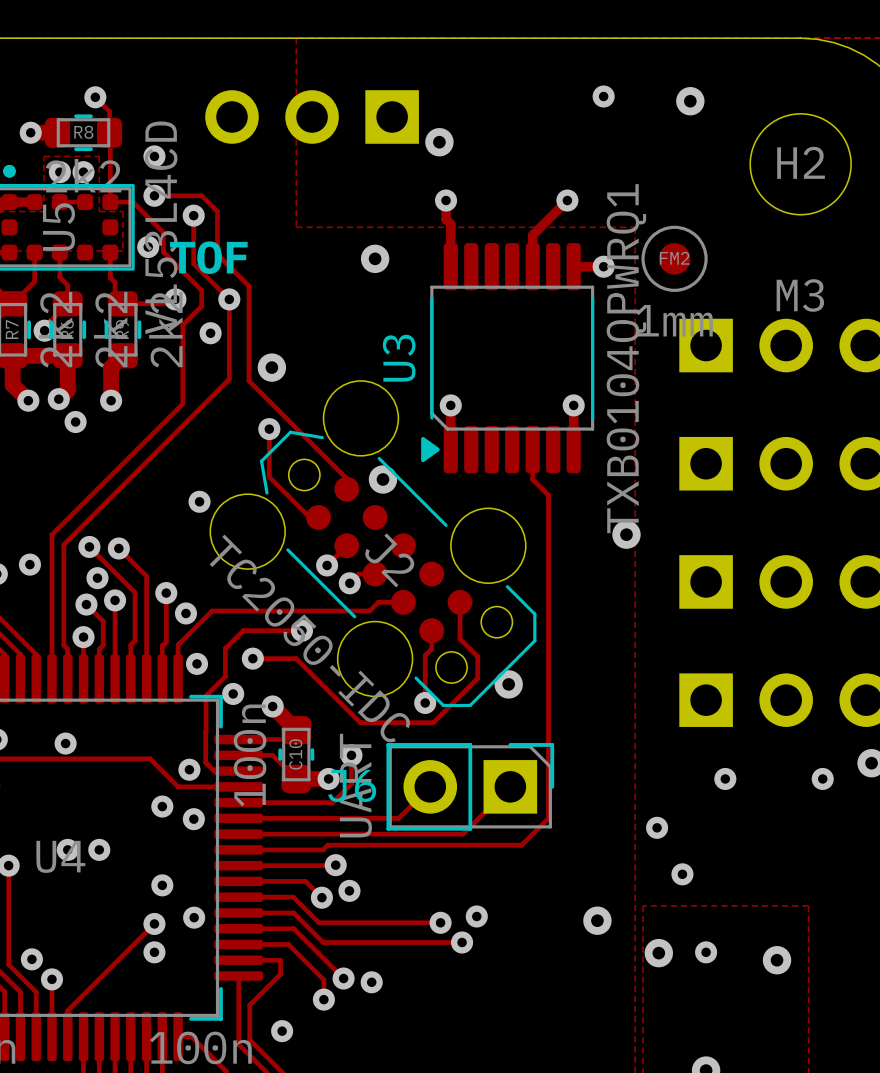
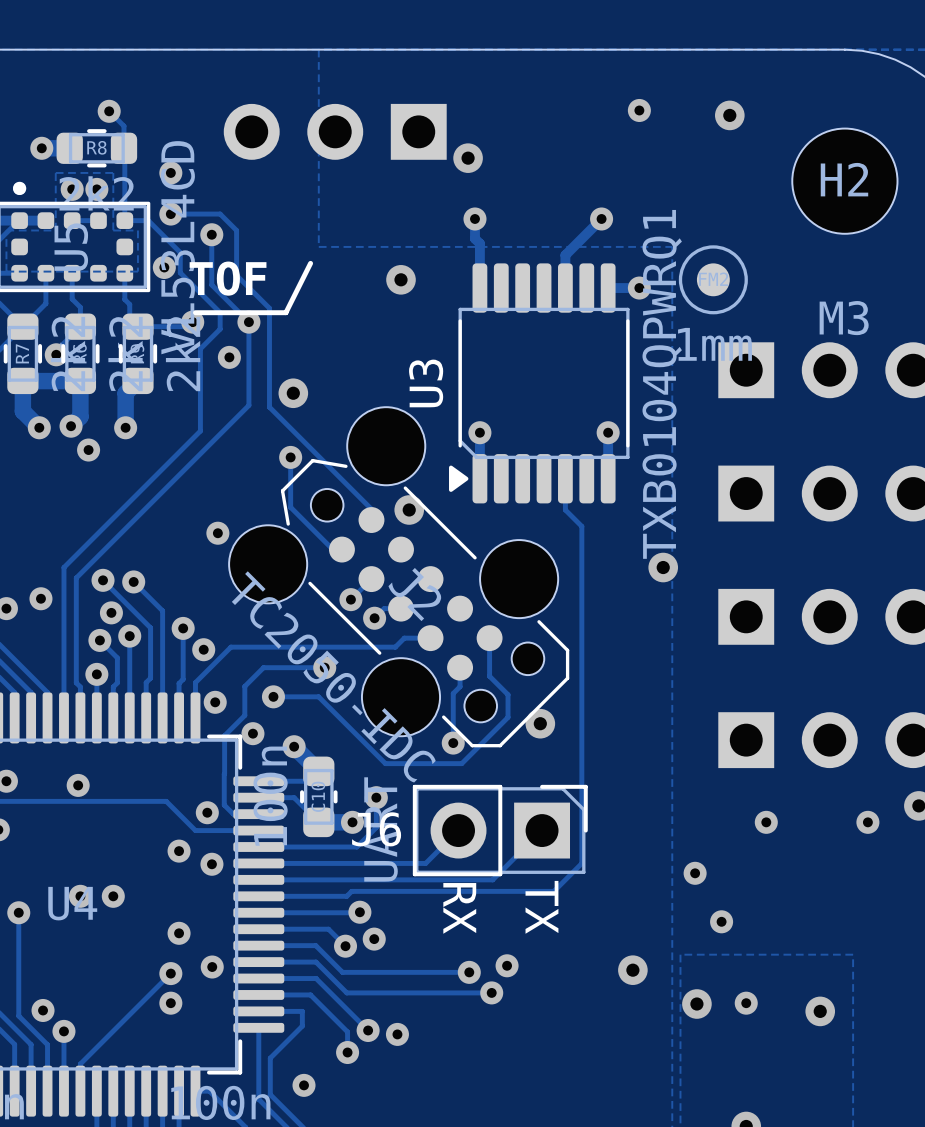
line: none -> (310, 263) (285, 312) (195, 312)
text: none -> TX (541, 907)
text: none -> RX (459, 908)

